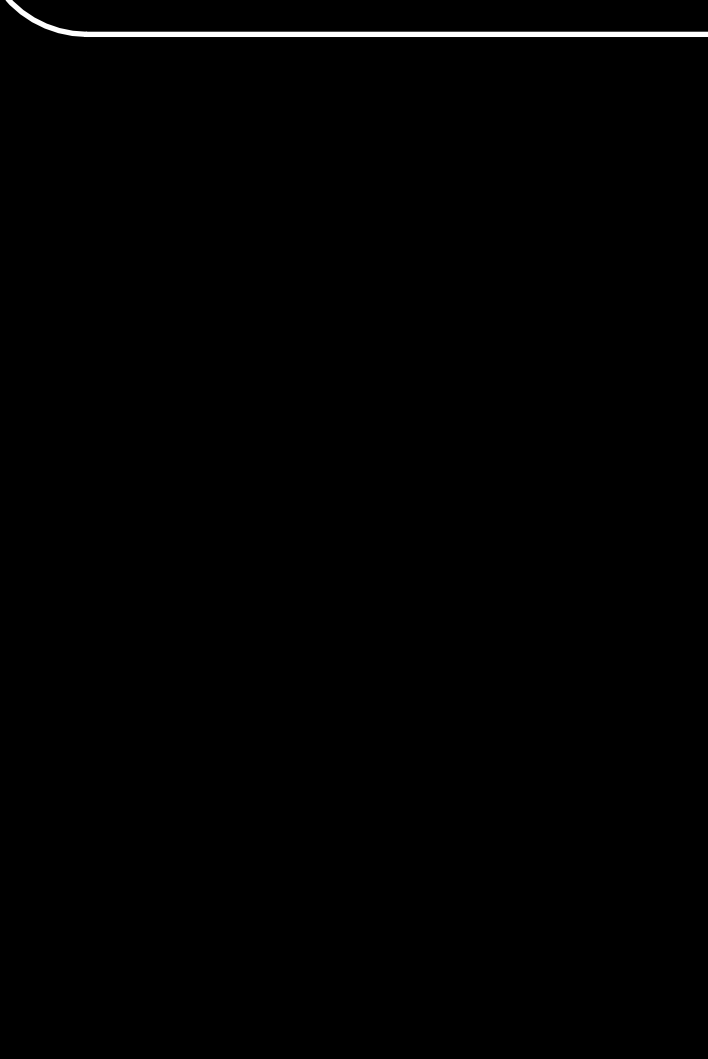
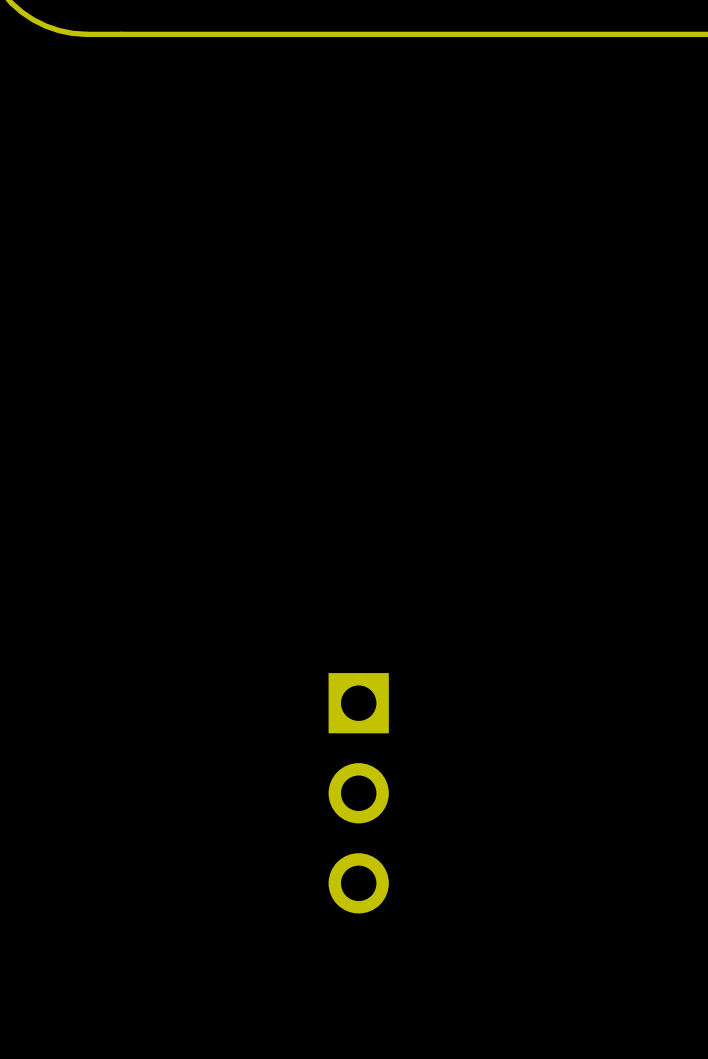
part: none -> (358, 793)

